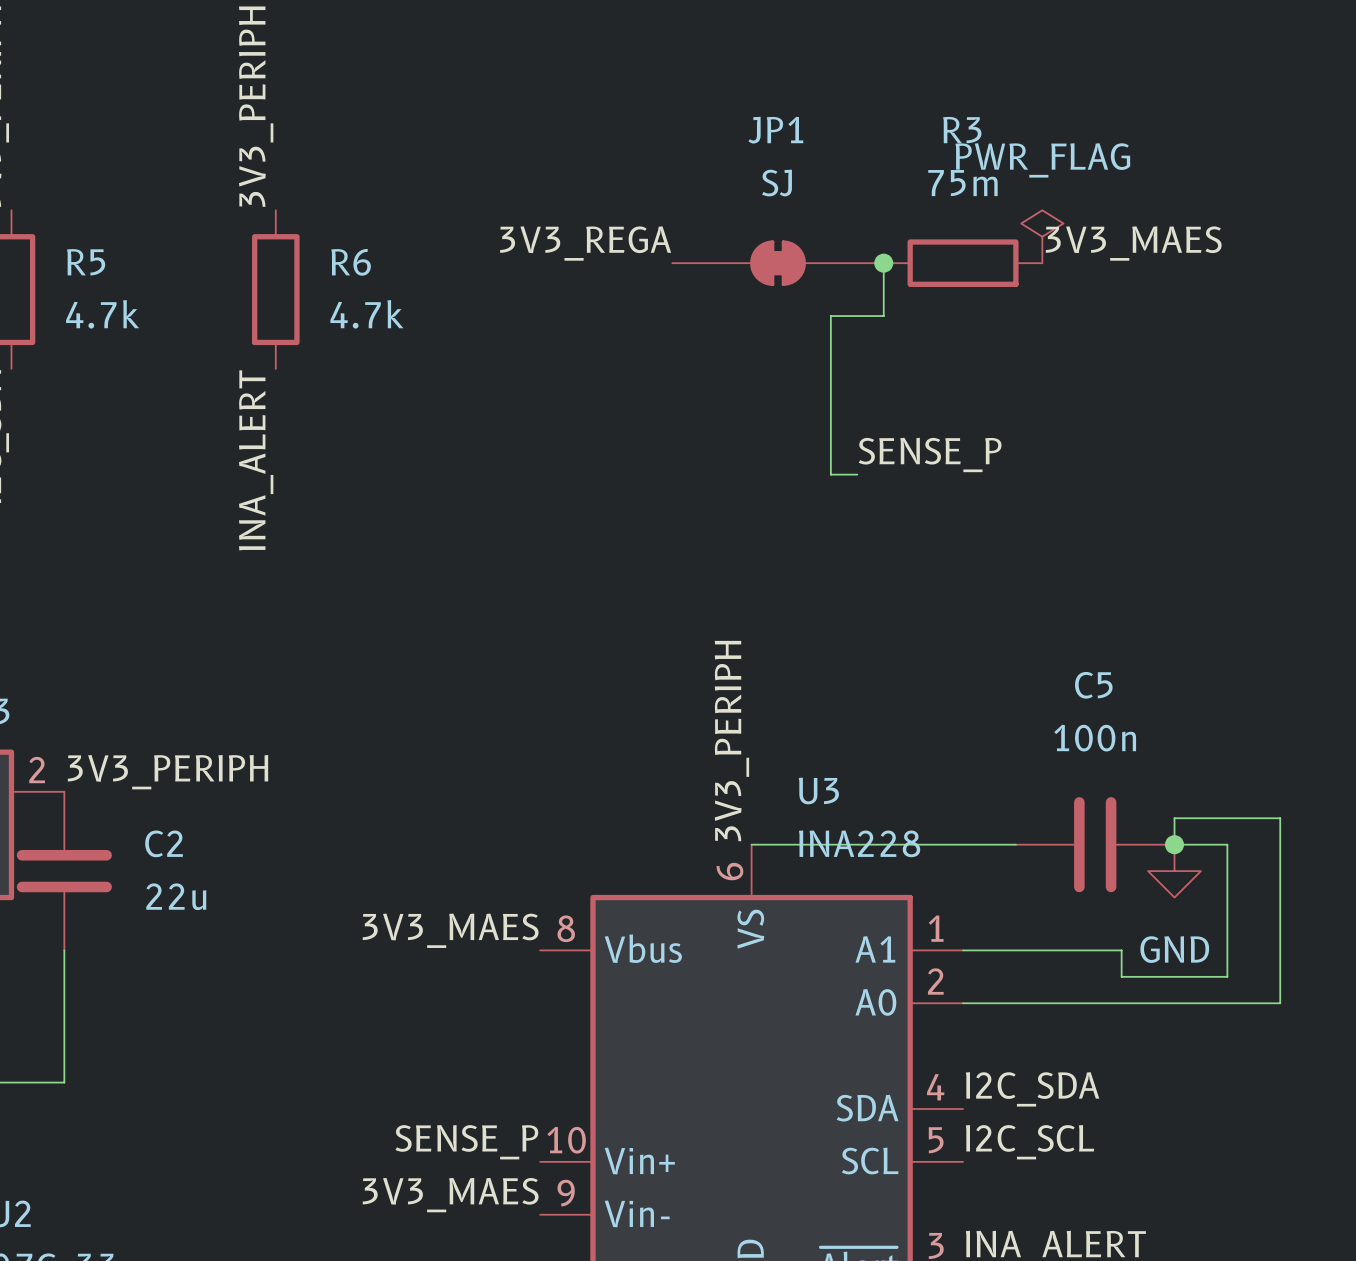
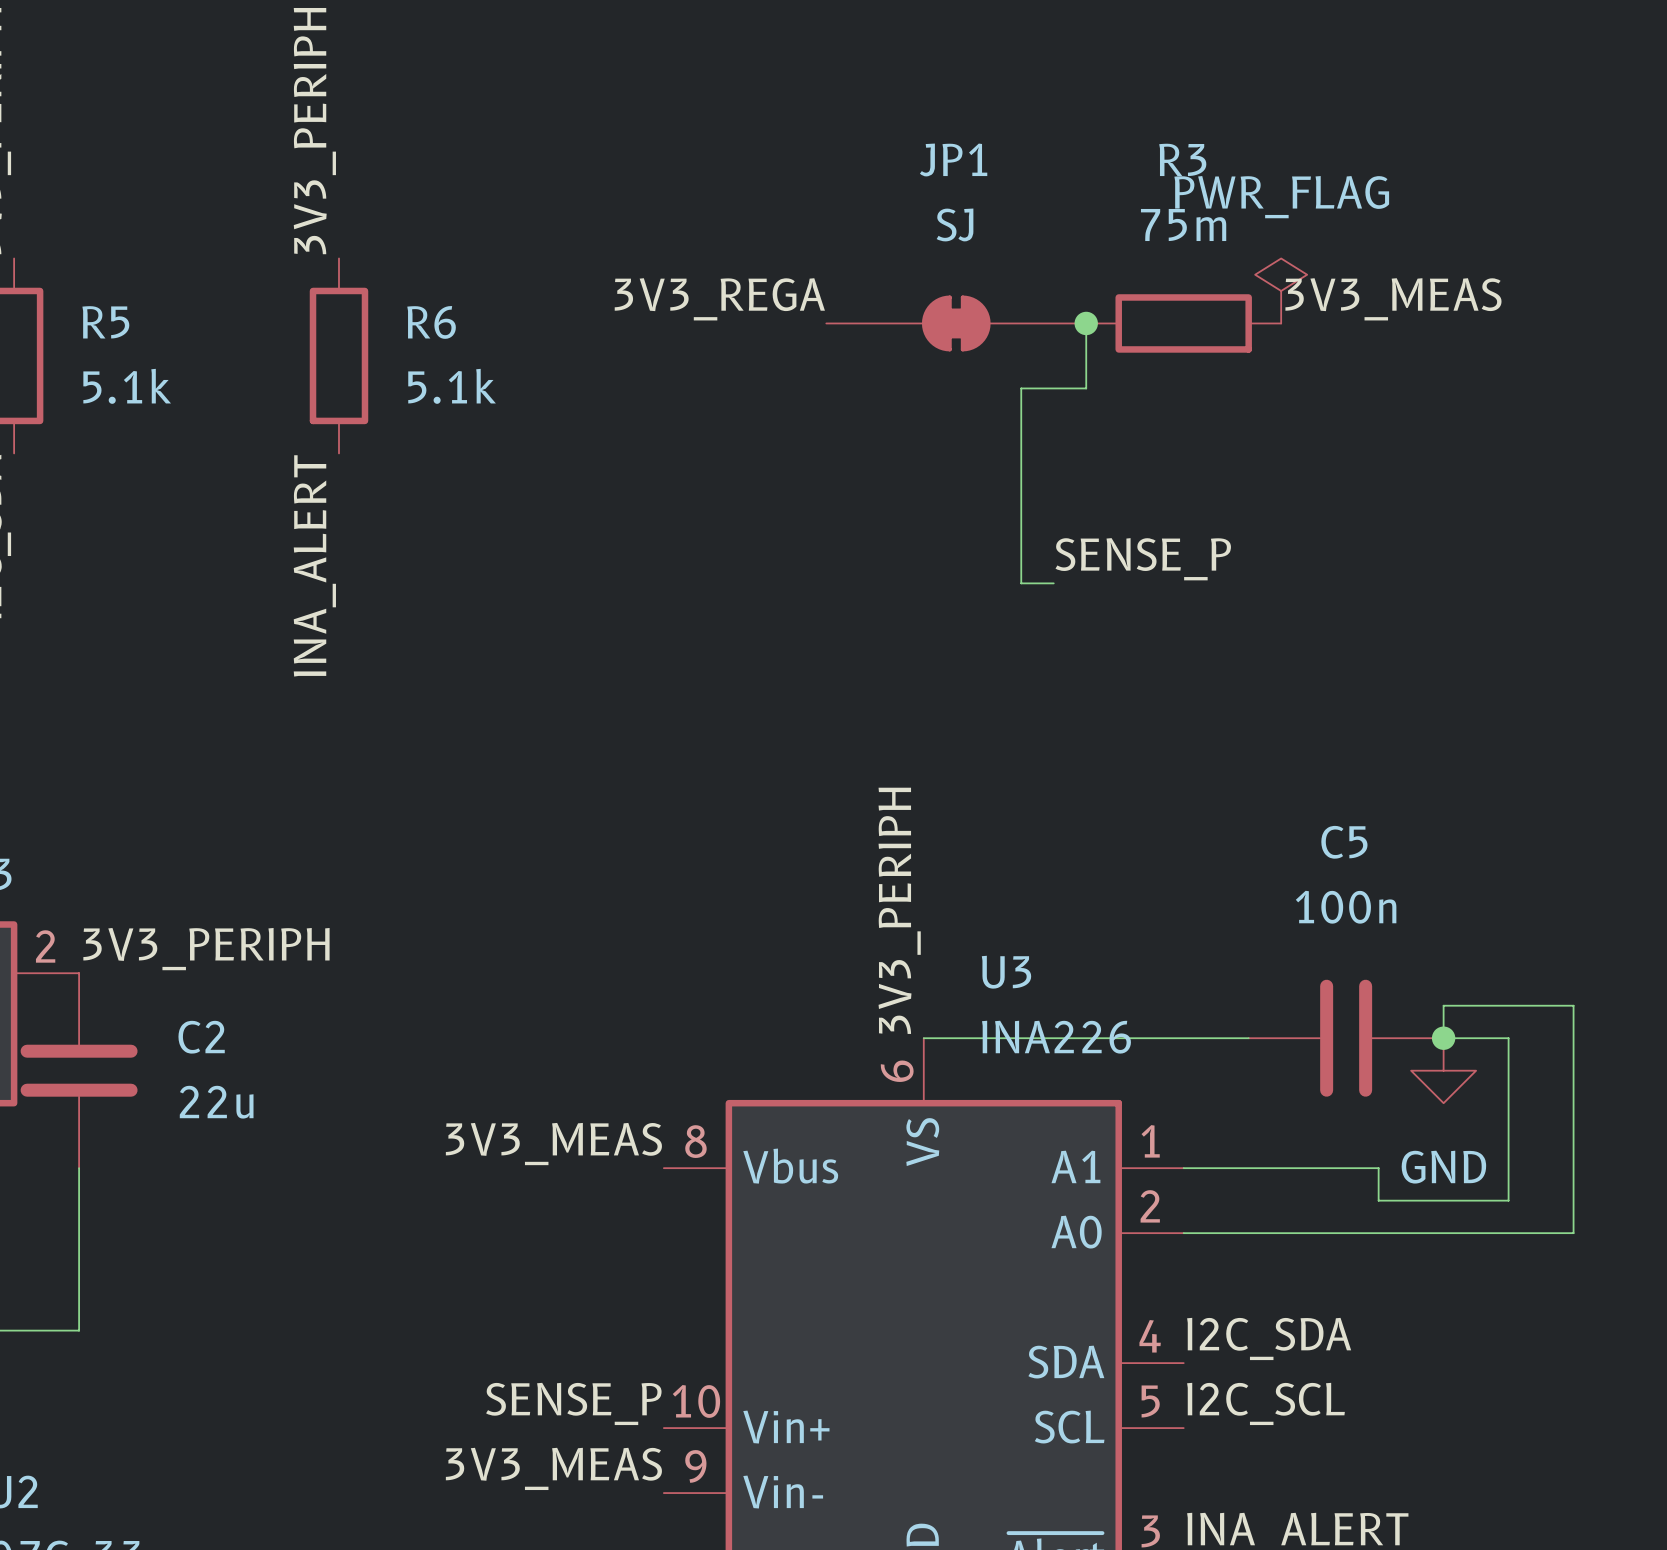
label: 3V3_MAES (1133, 243) -> 3V3_MEAS (1393, 299)
R5 value: 4.7k (102, 314) -> 5.1k (127, 386)
R6 value: 4.7k (366, 314) -> 5.1k (452, 386)
U3 value: INA228 (859, 843) -> INA226 (1056, 1037)
label: 3V3_MAES (450, 930) -> 3V3_MEAS (553, 1144)
label: 3V3_MAES (450, 1195) -> 3V3_MEAS (553, 1468)

